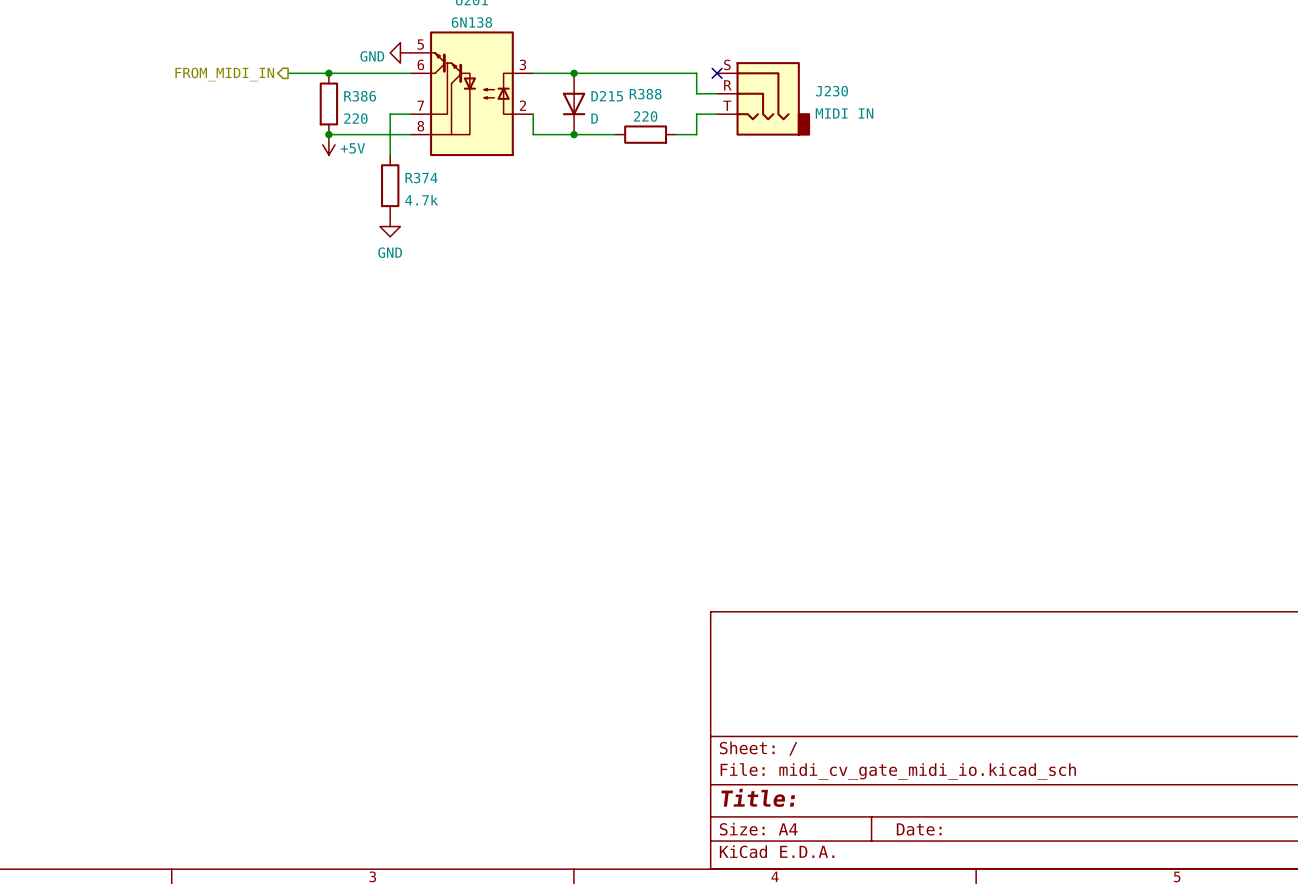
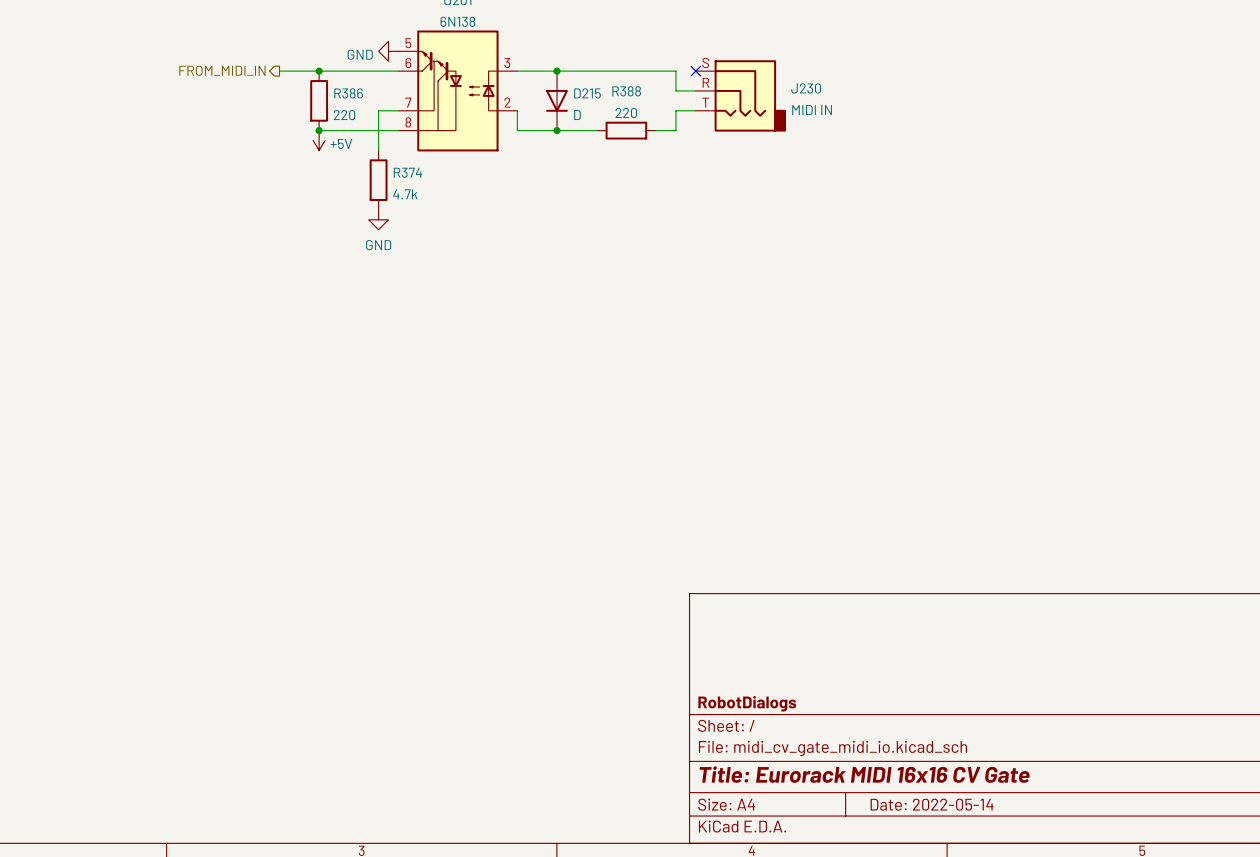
title block: none -> RobotDialogs (747, 703)
title block: Title: (758, 797) -> Title: Eurorack MIDI 16x16 CV Gate (864, 774)
title block: Date: (919, 829) -> Date: 2022-05-14 (932, 804)

